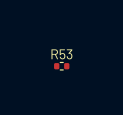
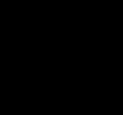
R53: (61, 66) -> none

